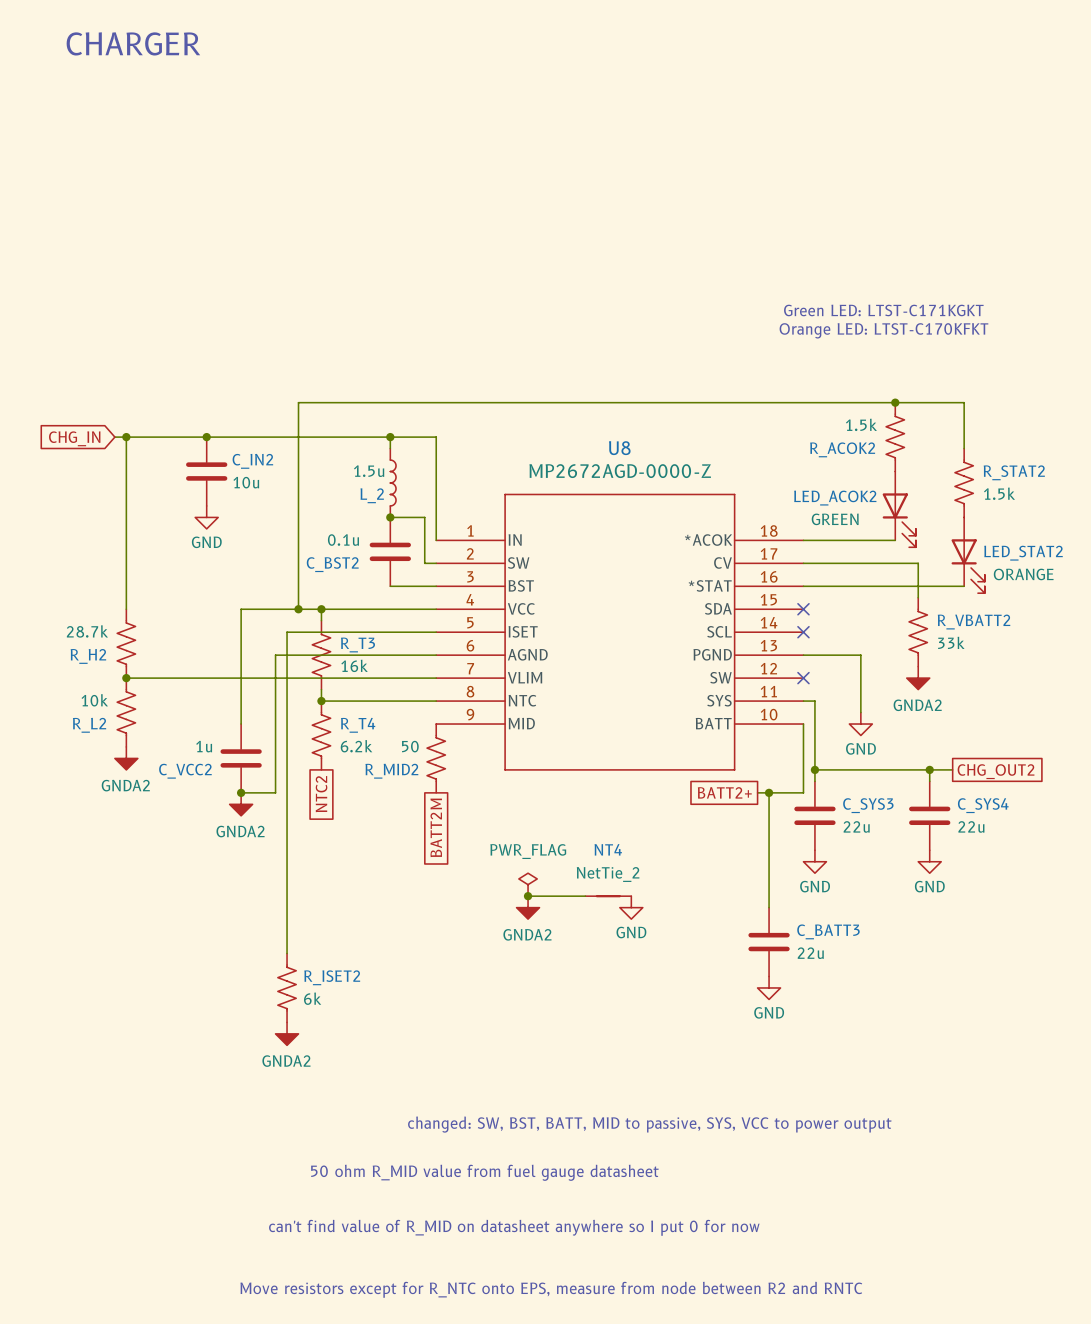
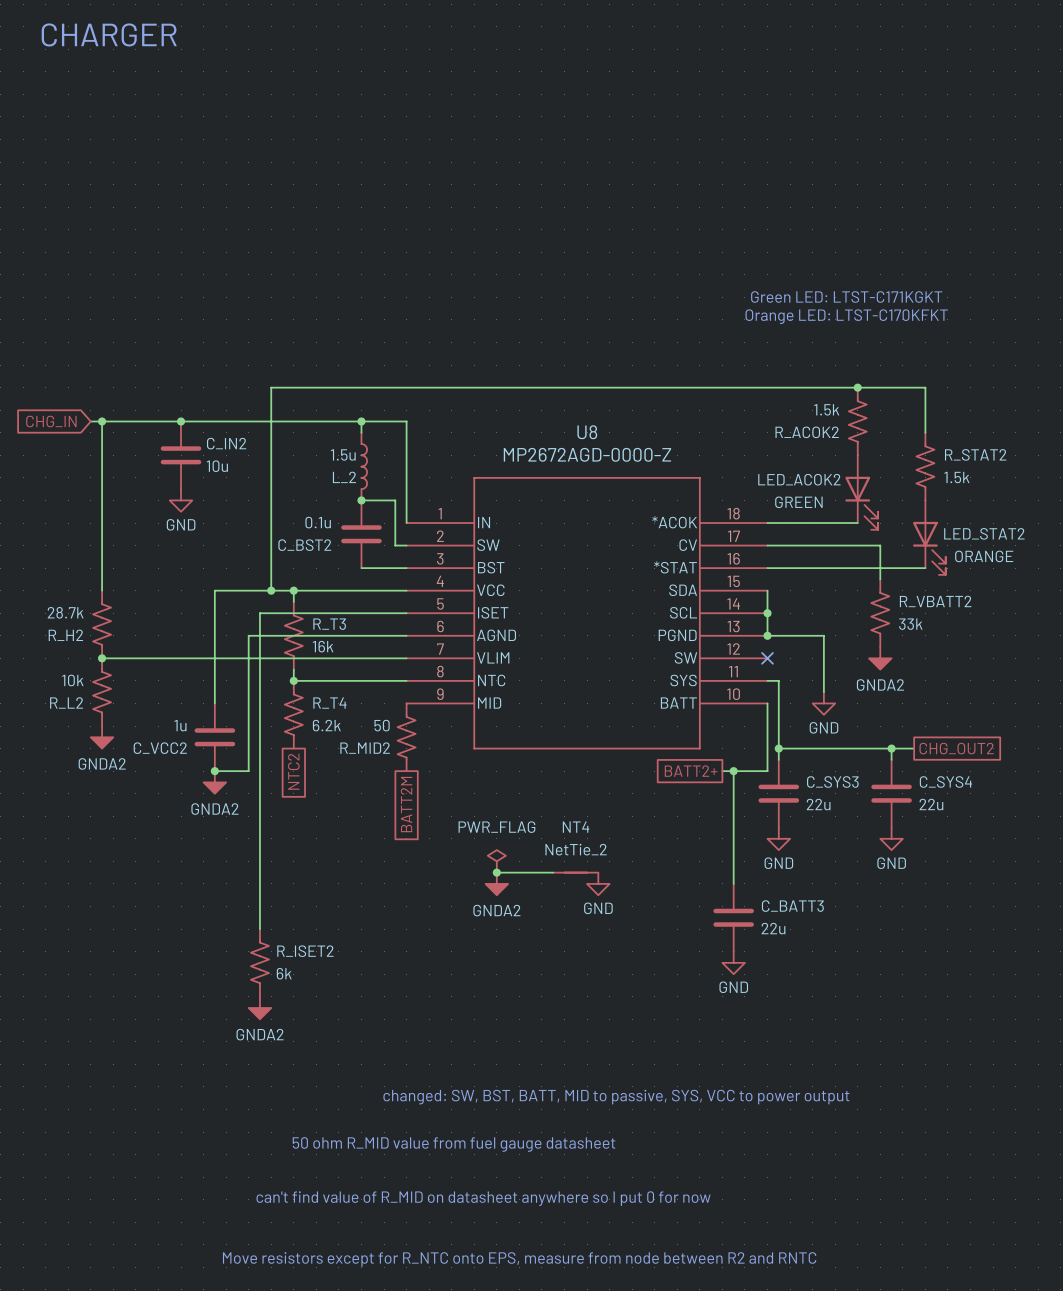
wire: none -> (767, 590) (767, 635)
no-connect mark: (803, 609) -> none
no-connect mark: (803, 632) -> none
junction: none -> (767, 613)
junction: none -> (767, 635)

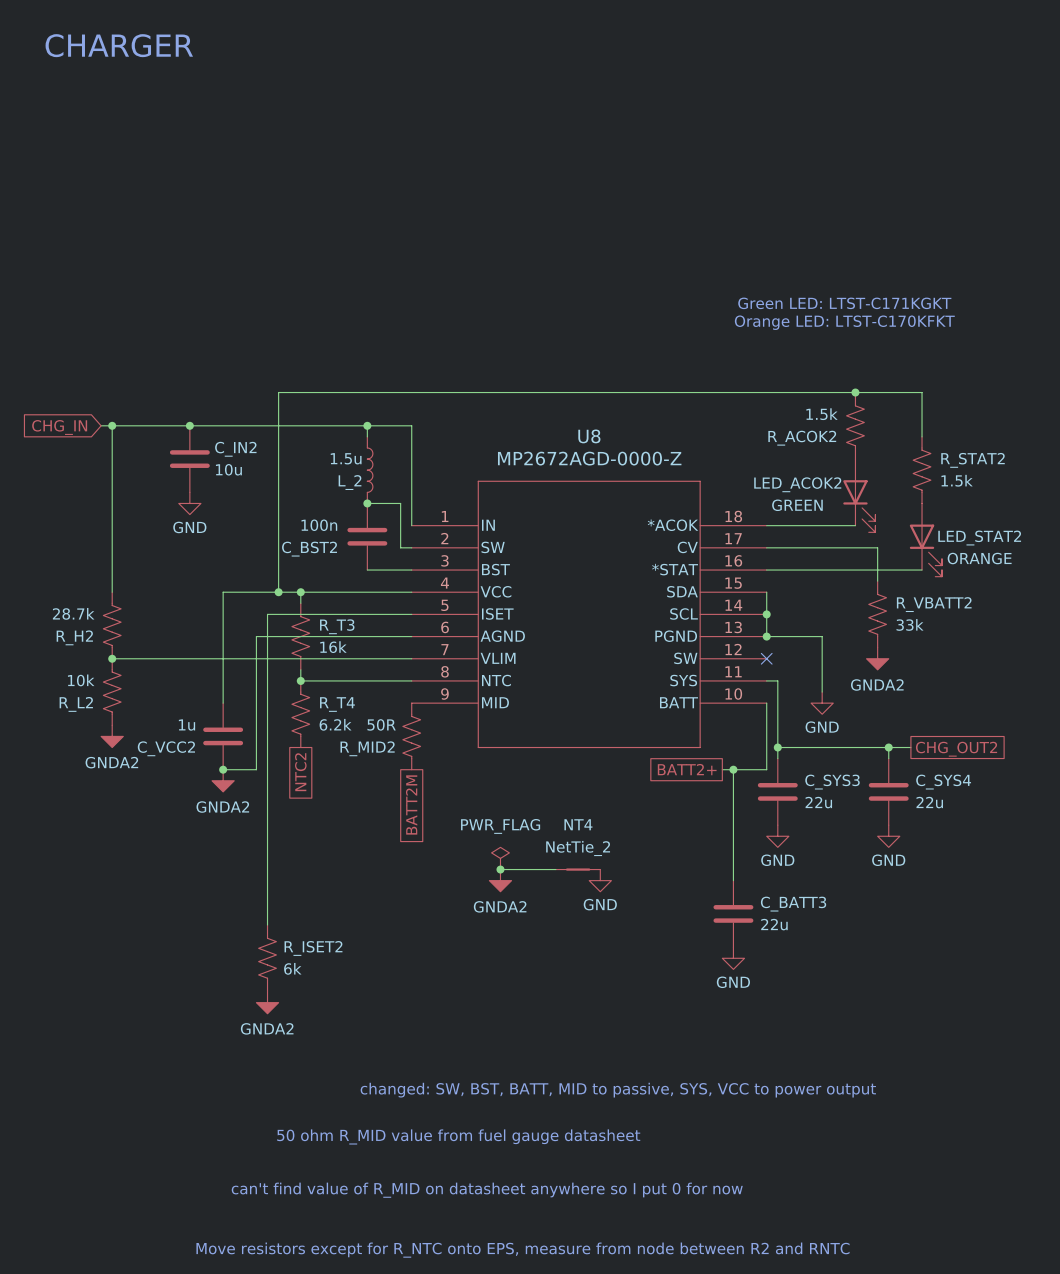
C_BST2 value: 0.1u (318, 522) -> 100n (319, 525)
R_MID2 value: 50 (382, 725) -> 50R (381, 724)

